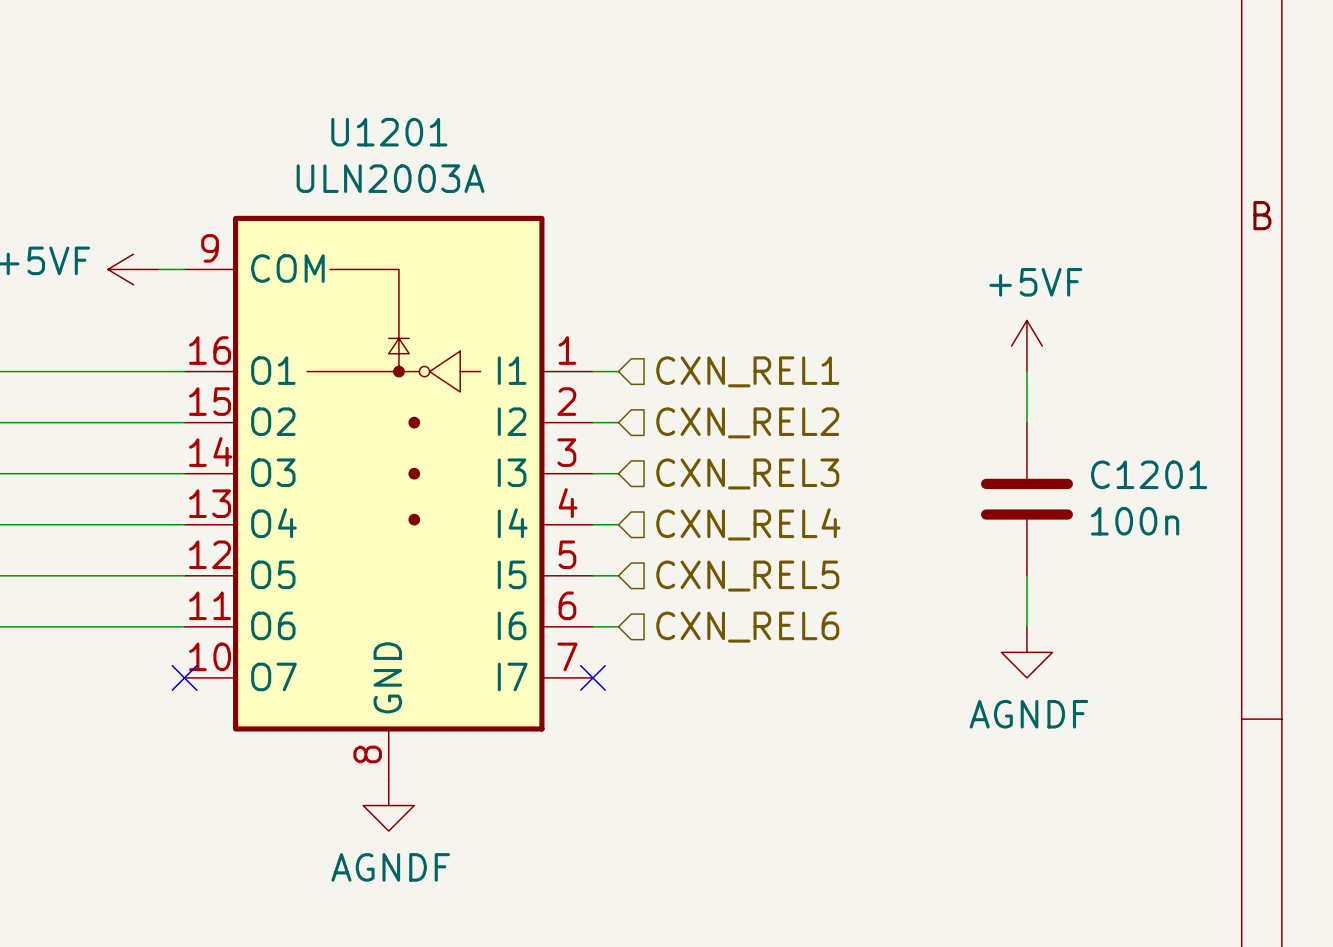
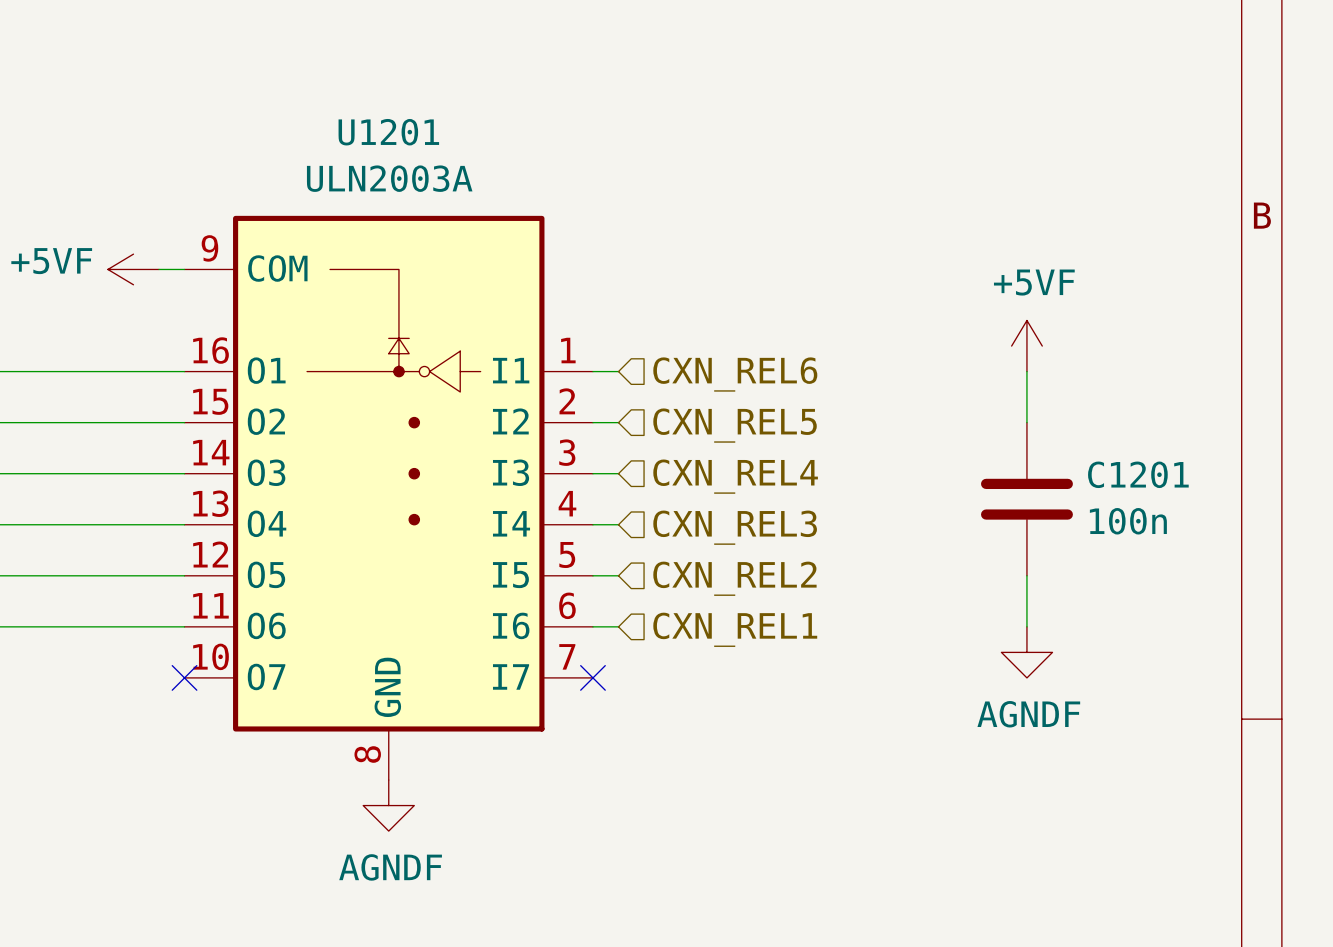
hierarchical label: CXN_REL1 (747, 371) -> CXN_REL6 (735, 374)
hierarchical label: CXN_REL2 (747, 422) -> CXN_REL5 (735, 425)
hierarchical label: CXN_REL3 (747, 473) -> CXN_REL4 (735, 476)
hierarchical label: CXN_REL4 (748, 524) -> CXN_REL3 (735, 527)
hierarchical label: CXN_REL5 (747, 576) -> CXN_REL2 (734, 578)
hierarchical label: CXN_REL6 (747, 627) -> CXN_REL1 (735, 629)

